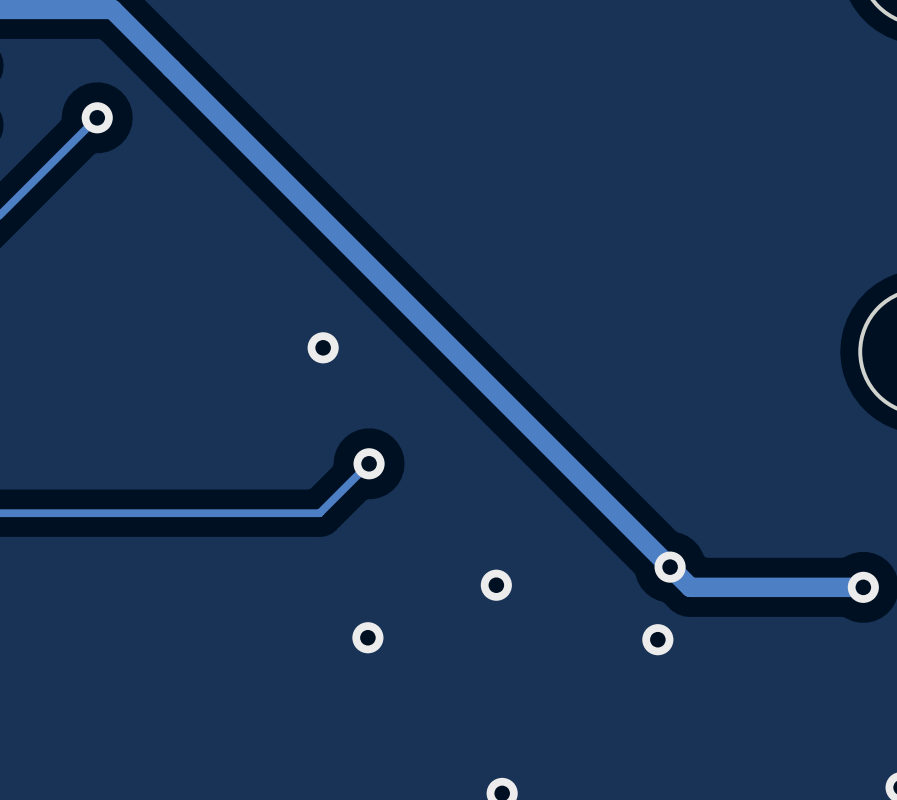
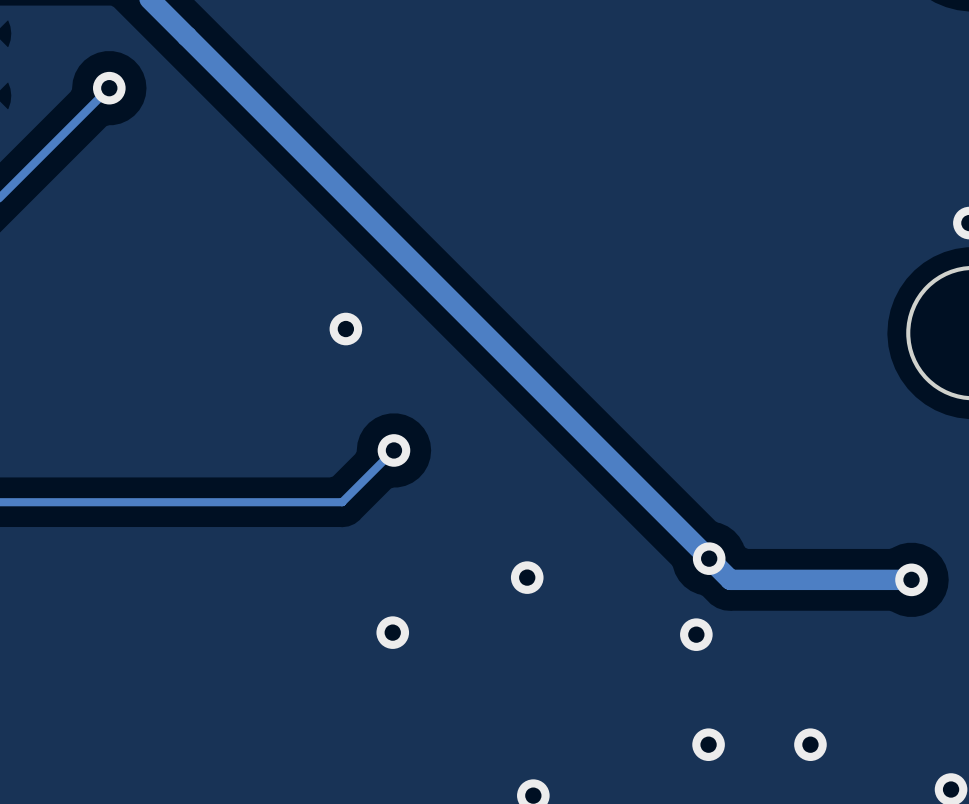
via: none -> (708, 744)
via: none -> (810, 744)

